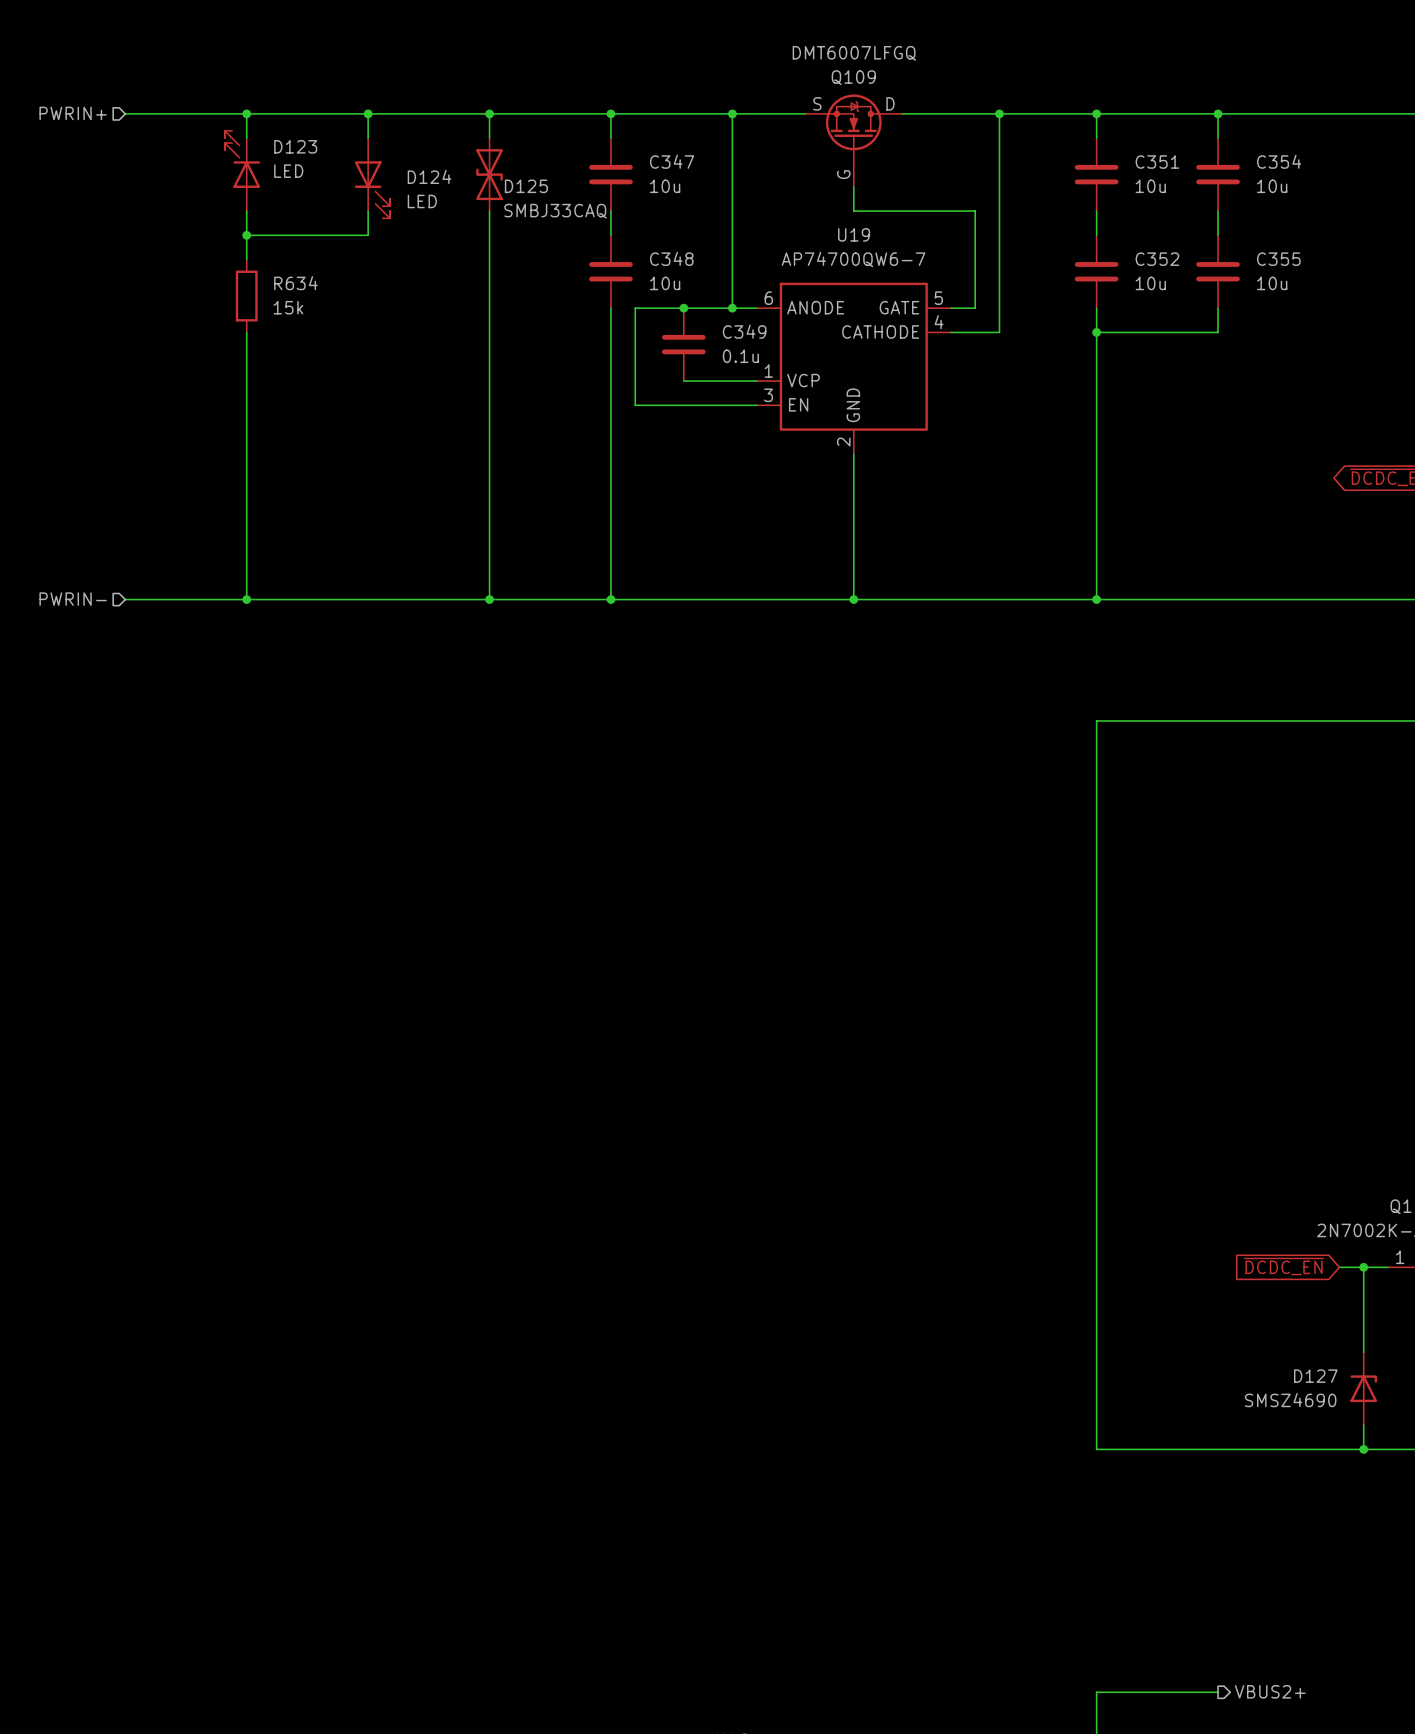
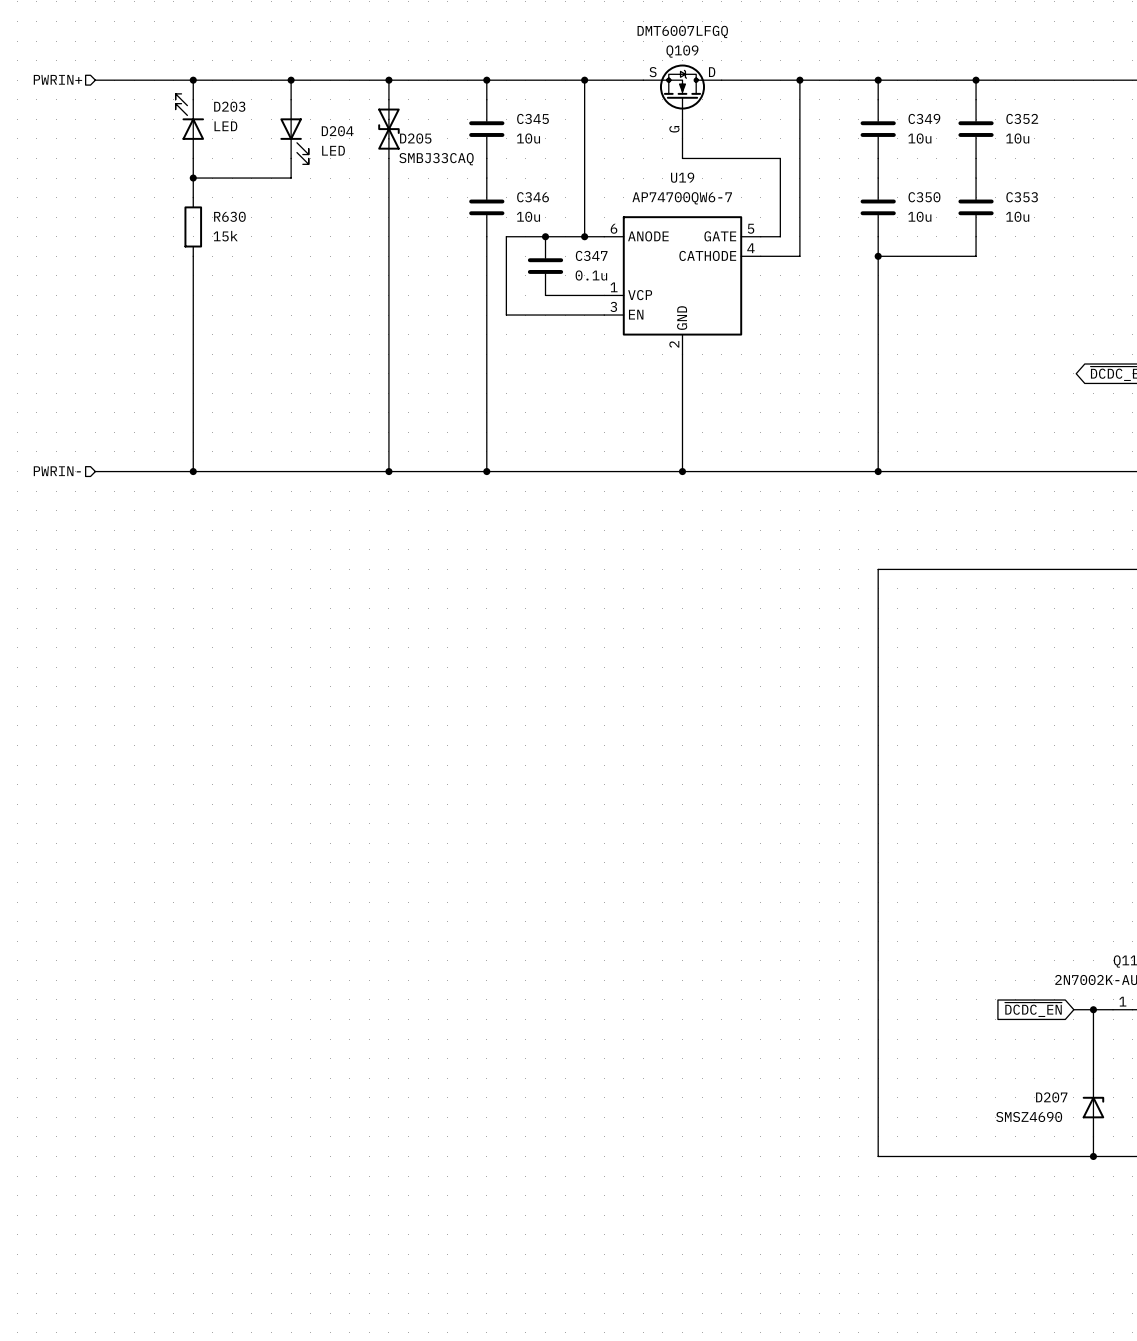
D123 name: D123 (295, 146) -> D203 (229, 106)
C347 name: C347 (672, 161) -> C345 (533, 118)
C354 name: C354 (1279, 161) -> C352 (1022, 118)
C351 name: C351 (1157, 162) -> C349 (924, 118)
D124 name: D124 (429, 176) -> D204 (337, 131)
D125 name: D125 (526, 186) -> D205 (415, 138)
C348 name: C348 (671, 258) -> C346 (533, 197)
C352 name: C352 (1157, 259) -> C350 (924, 197)
C355 name: C355 (1278, 259) -> C353 (1022, 197)
R634 name: R634 (295, 283) -> R630 (229, 216)
C349 name: C349 (744, 331) -> C347 (591, 255)
D127 name: D127 (1315, 1376) -> D207 (1051, 1097)

